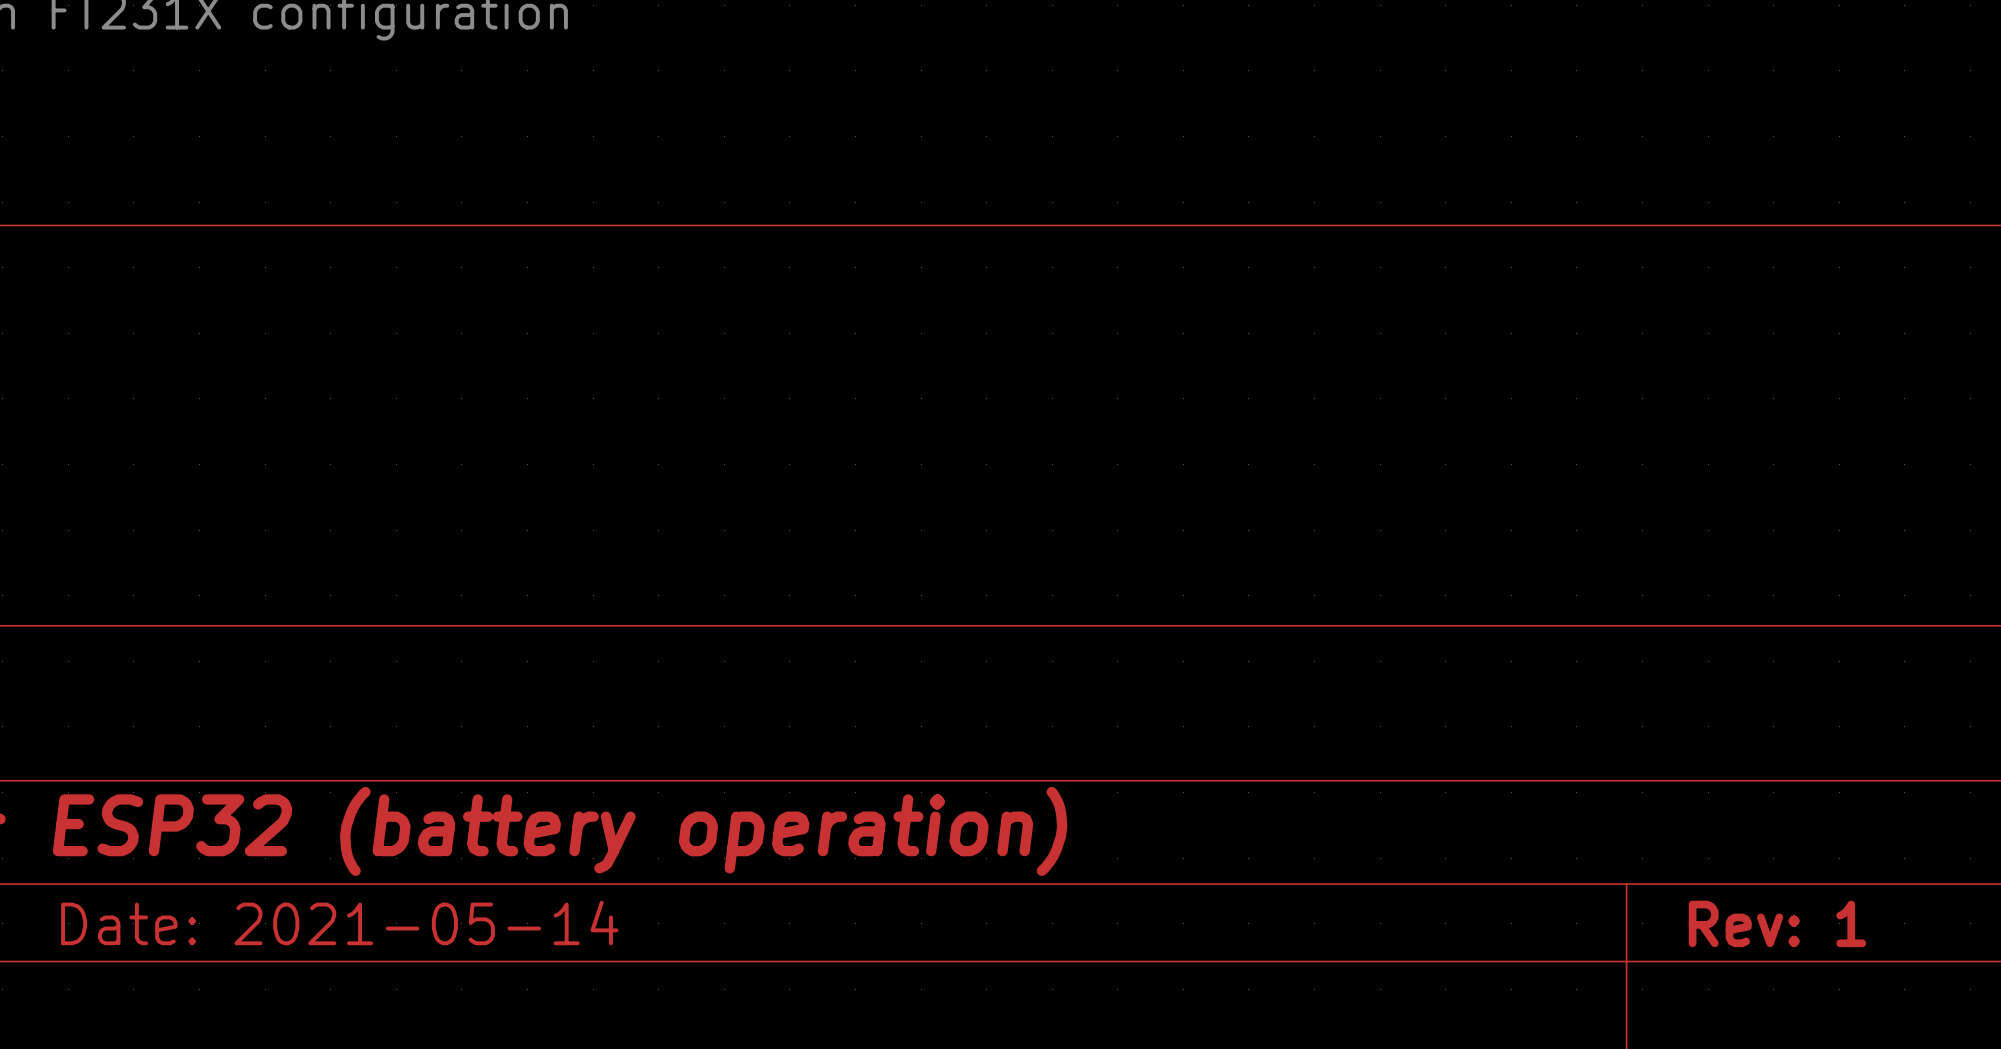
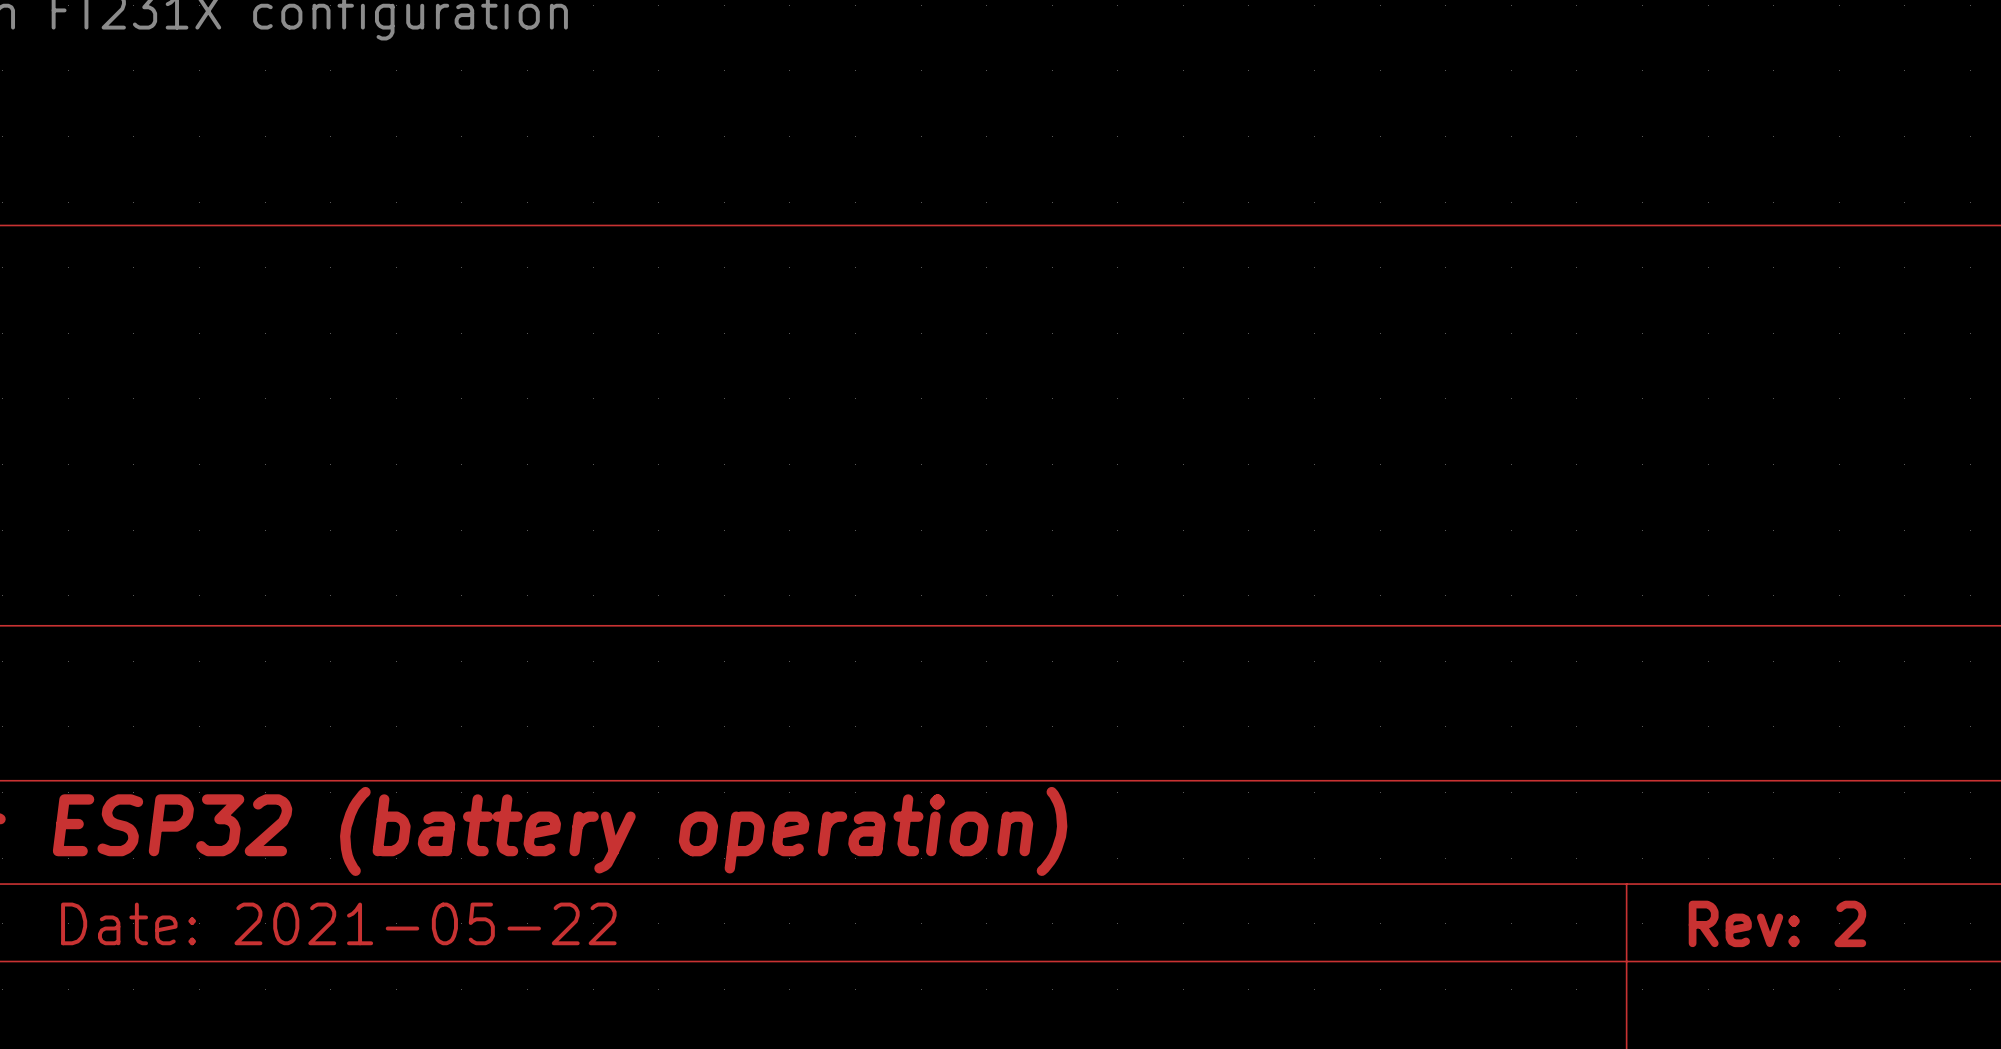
title block: Date: 2021-05-14 (339, 922) -> Date: 2021-05-22 (338, 923)
title block: Rev: 1 (1777, 923) -> Rev: 2 (1777, 923)

